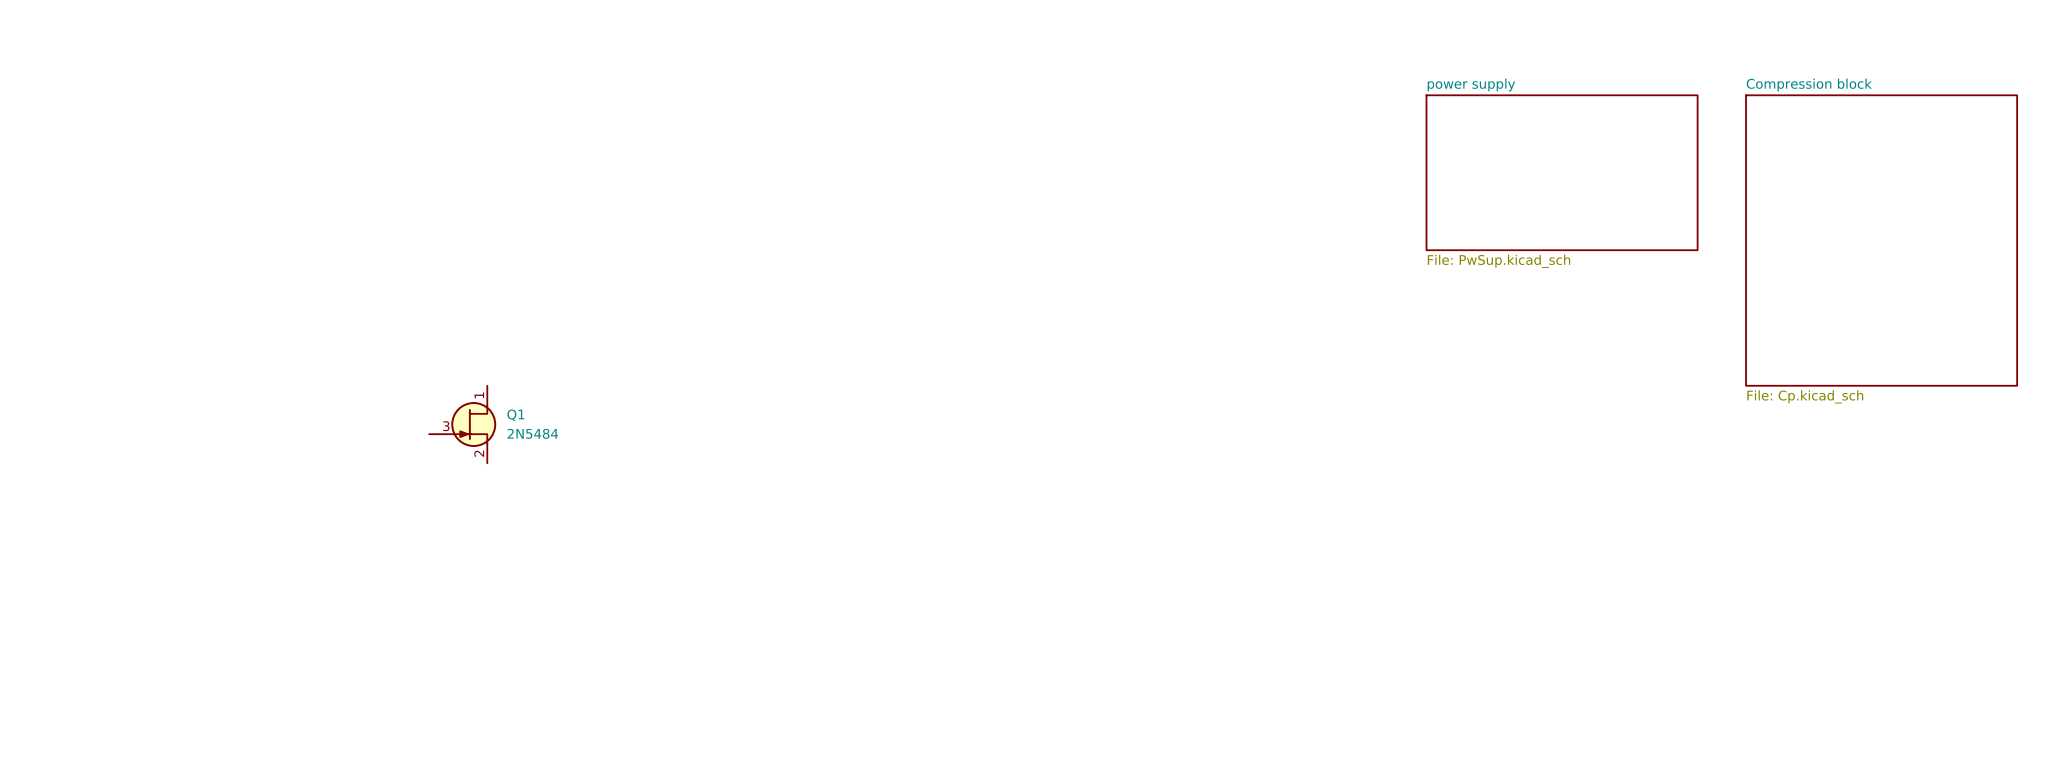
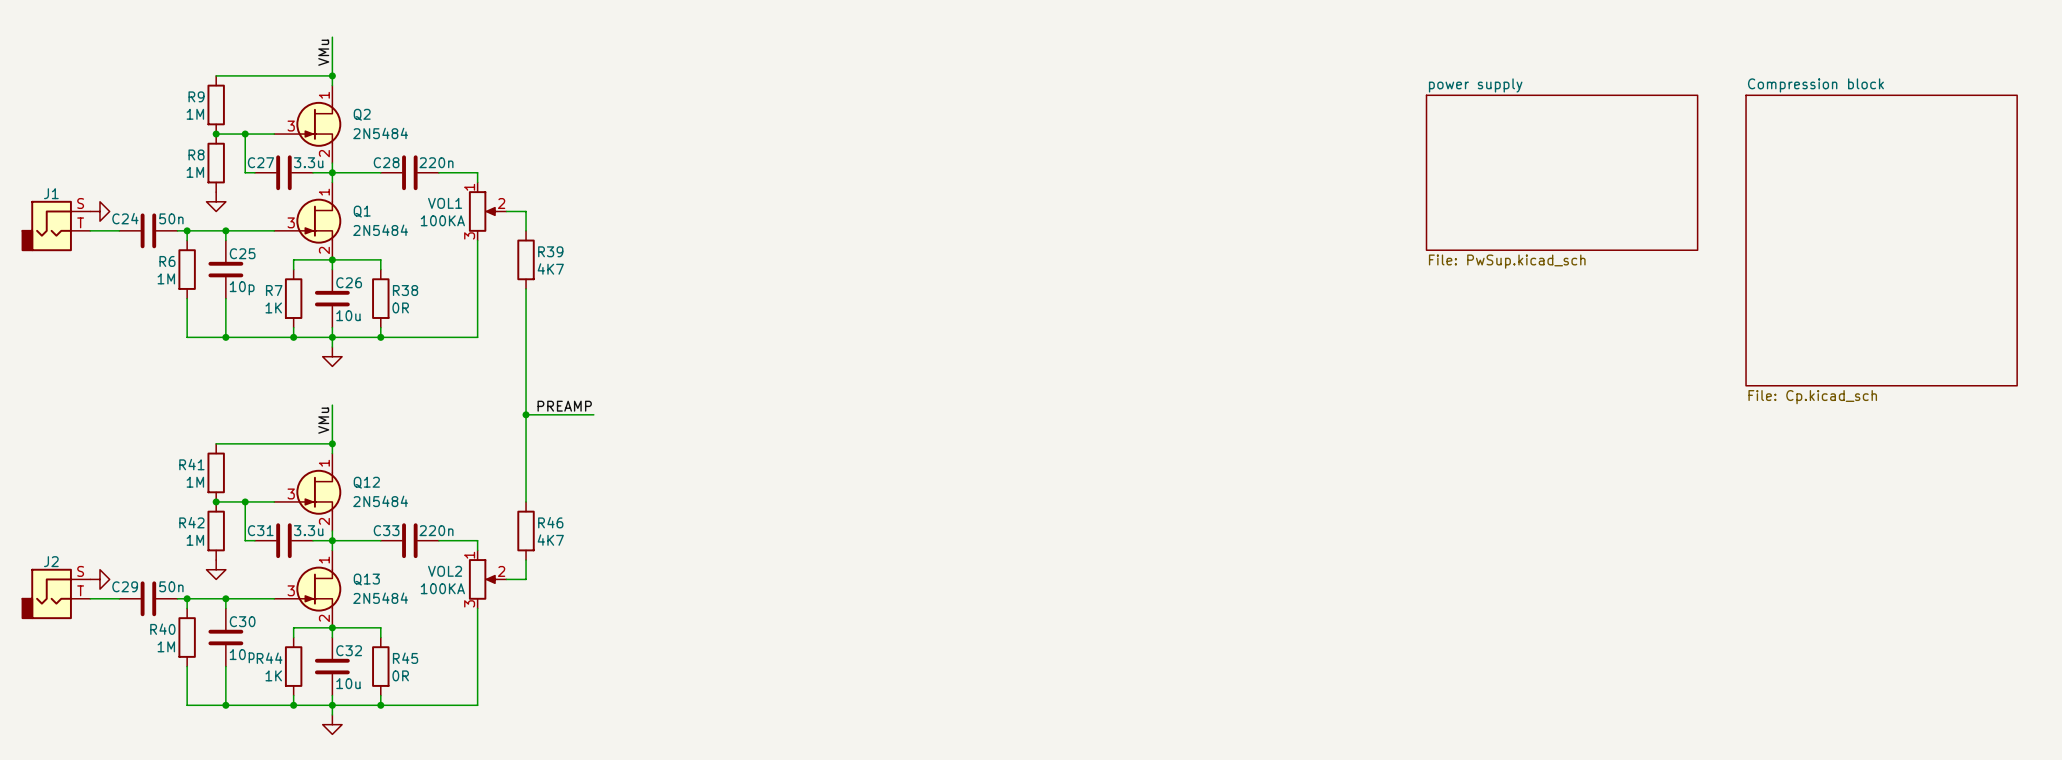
wire: none -> (332, 37) (332, 85)
label: none -> VMu (323, 52)
wire: none -> (216, 75) (332, 75)
junction: none -> (332, 75)
R9: none -> 1M (216, 104)
Q2: none -> 2N5484 (307, 124)
wire: none -> (216, 134) (274, 134)
junction: none -> (216, 134)
wire: none -> (245, 134) (245, 172) (254, 172)
junction: none -> (245, 134)
R8: none -> 1M (216, 163)
wire: none -> (332, 163) (332, 182)
C27: none -> 3.3u (283, 172)
wire: none -> (313, 172) (380, 172)
junction: none -> (332, 172)
C28: none -> 220n (409, 172)
wire: none -> (438, 172) (477, 172) (477, 182)
power symbol: none -> (216, 201)
power symbol: none -> (99, 211)
VOL1: none -> 100KA (487, 211)
wire: none -> (506, 211) (526, 211) (526, 230)
J1: none -> (55, 226)
wire: none -> (90, 230) (119, 230)
C24: none -> 50n (148, 230)
wire: none -> (177, 230) (274, 230)
wire: none -> (187, 230) (187, 240)
junction: none -> (187, 230)
wire: none -> (225, 230) (225, 240)
junction: none -> (225, 230)
wire: none -> (477, 240) (477, 337) (187, 337) (187, 298)
wire: none -> (332, 259) (332, 269)
junction: none -> (332, 259)
R39: none -> 4K7 (526, 259)
R6: none -> 1M (187, 269)
C25: none -> 10p (225, 269)
wire: none -> (293, 269) (293, 259) (380, 259) (380, 269)
wire: none -> (526, 288) (526, 501)
wire: none -> (225, 298) (225, 337)
R7: none -> 1K (293, 298)
C26: none -> 10u (332, 298)
R38: none -> 0R (380, 298)
wire: none -> (293, 327) (293, 337)
wire: none -> (332, 327) (332, 347)
wire: none -> (380, 327) (380, 337)
junction: none -> (225, 337)
junction: none -> (293, 337)
junction: none -> (332, 337)
junction: none -> (380, 337)
power symbol: none -> (332, 356)
wire: none -> (332, 405) (332, 453)
label: none -> PREAMP (564, 406)
wire: none -> (526, 414) (593, 414)
junction: none -> (526, 414)
label: none -> VMu (323, 420)
Q1 position: (462, 424) -> (307, 221)
wire: none -> (216, 443) (332, 443)
junction: none -> (332, 443)
R41: none -> 1M (216, 472)
Q12: none -> 2N5484 (307, 492)
wire: none -> (216, 501) (274, 501)
junction: none -> (216, 501)
wire: none -> (245, 501) (245, 540) (254, 540)
junction: none -> (245, 501)
R42: none -> 1M (216, 531)
wire: none -> (332, 531) (332, 550)
R46: none -> 4K7 (526, 531)
C31: none -> 3.3u (283, 540)
wire: none -> (313, 540) (380, 540)
junction: none -> (332, 540)
C33: none -> 220n (409, 540)
wire: none -> (438, 540) (477, 540) (477, 550)
wire: none -> (526, 560) (526, 579) (506, 579)
power symbol: none -> (216, 569)
power symbol: none -> (99, 579)
VOL2: none -> 100KA (487, 579)
Q13: none -> 2N5484 (307, 589)
J2: none -> (55, 593)
wire: none -> (90, 598) (119, 598)
C29: none -> 50n (148, 598)
wire: none -> (177, 598) (274, 598)
wire: none -> (187, 598) (187, 608)
junction: none -> (187, 598)
wire: none -> (225, 598) (225, 608)
junction: none -> (225, 598)
wire: none -> (477, 608) (477, 705) (187, 705) (187, 666)
wire: none -> (332, 627) (332, 637)
junction: none -> (332, 627)
R40: none -> 1M (187, 637)
C30: none -> 10p (225, 637)
wire: none -> (293, 637) (293, 627) (380, 627) (380, 637)
wire: none -> (225, 666) (225, 705)
R44: none -> 1K (293, 666)
C32: none -> 10u (332, 666)
R45: none -> 0R (380, 666)
wire: none -> (293, 695) (293, 705)
wire: none -> (332, 695) (332, 714)
wire: none -> (380, 695) (380, 705)
junction: none -> (225, 705)
junction: none -> (293, 705)
junction: none -> (332, 705)
junction: none -> (380, 705)
power symbol: none -> (332, 724)

